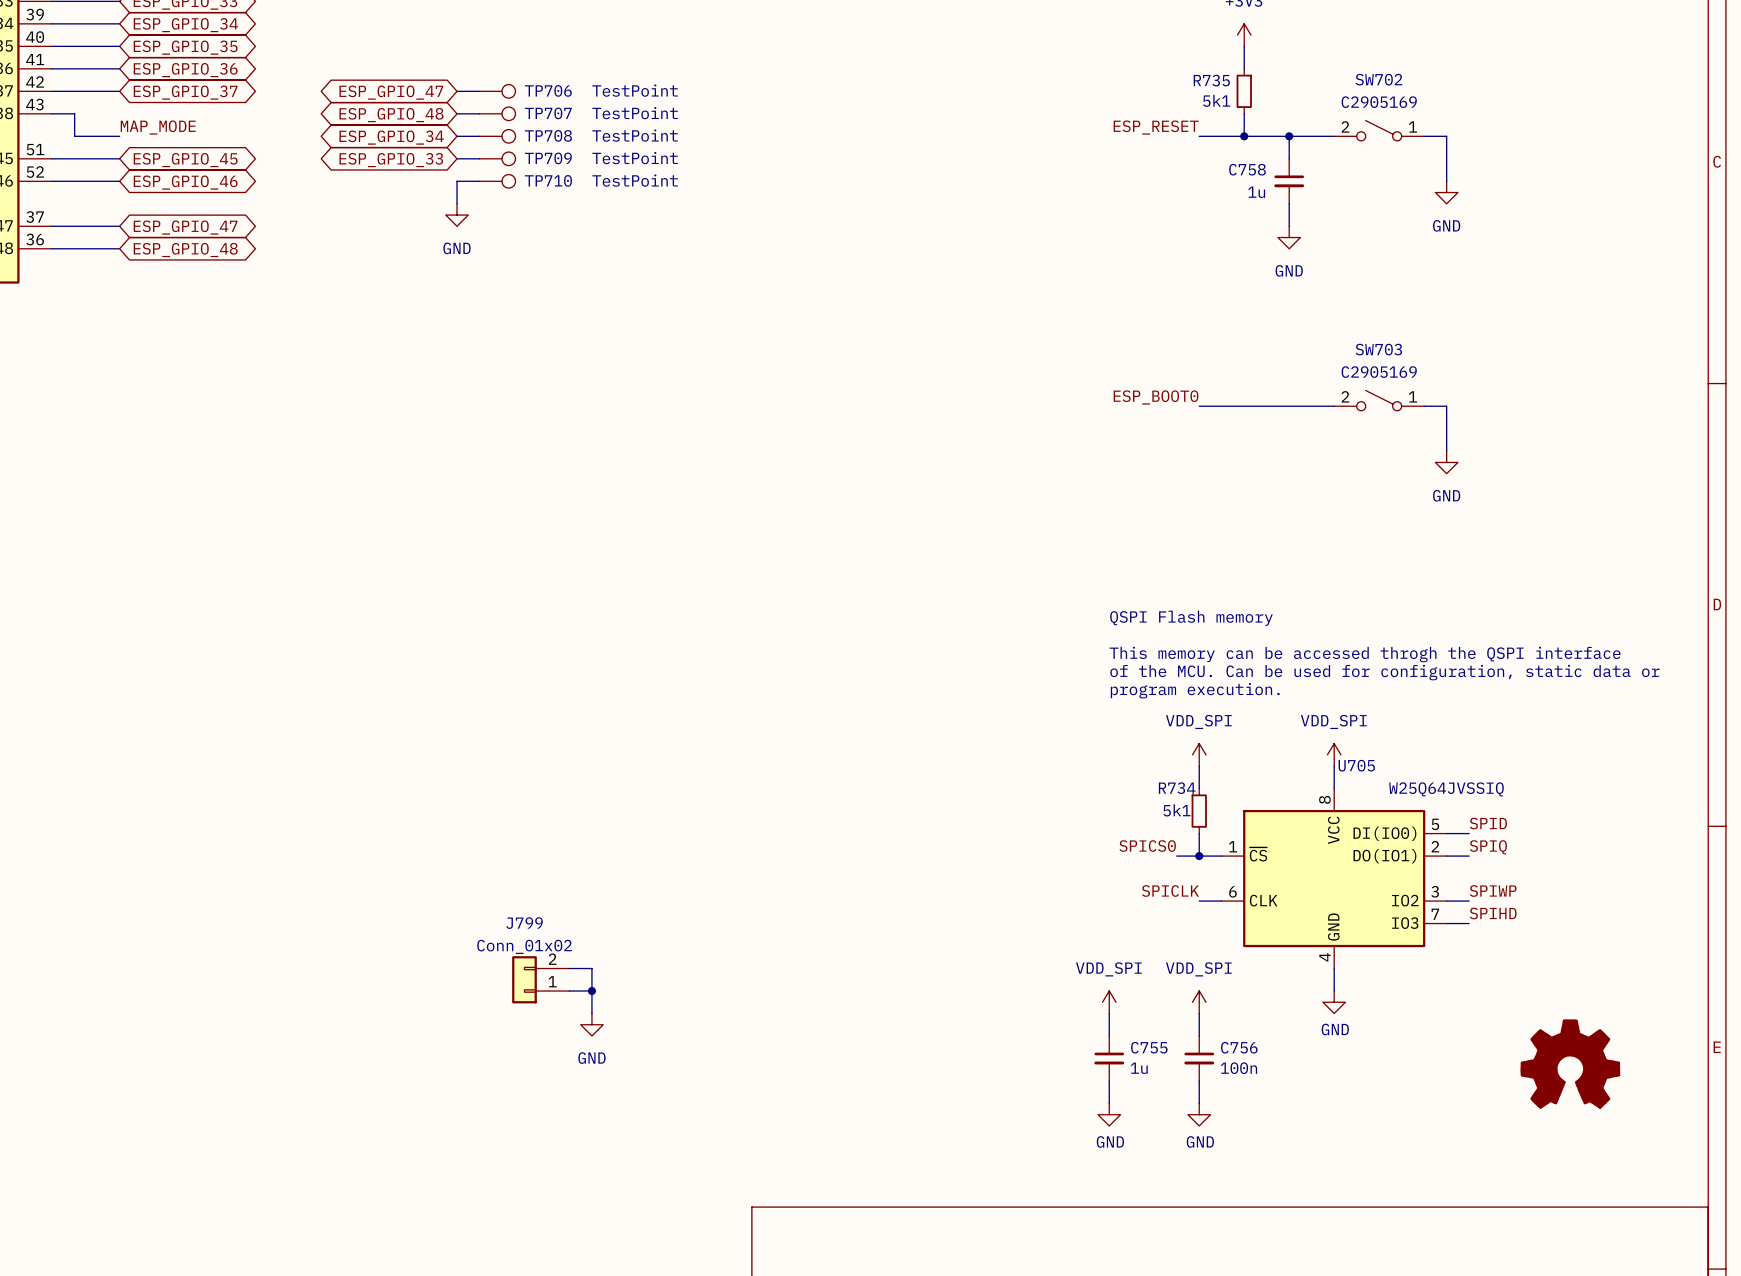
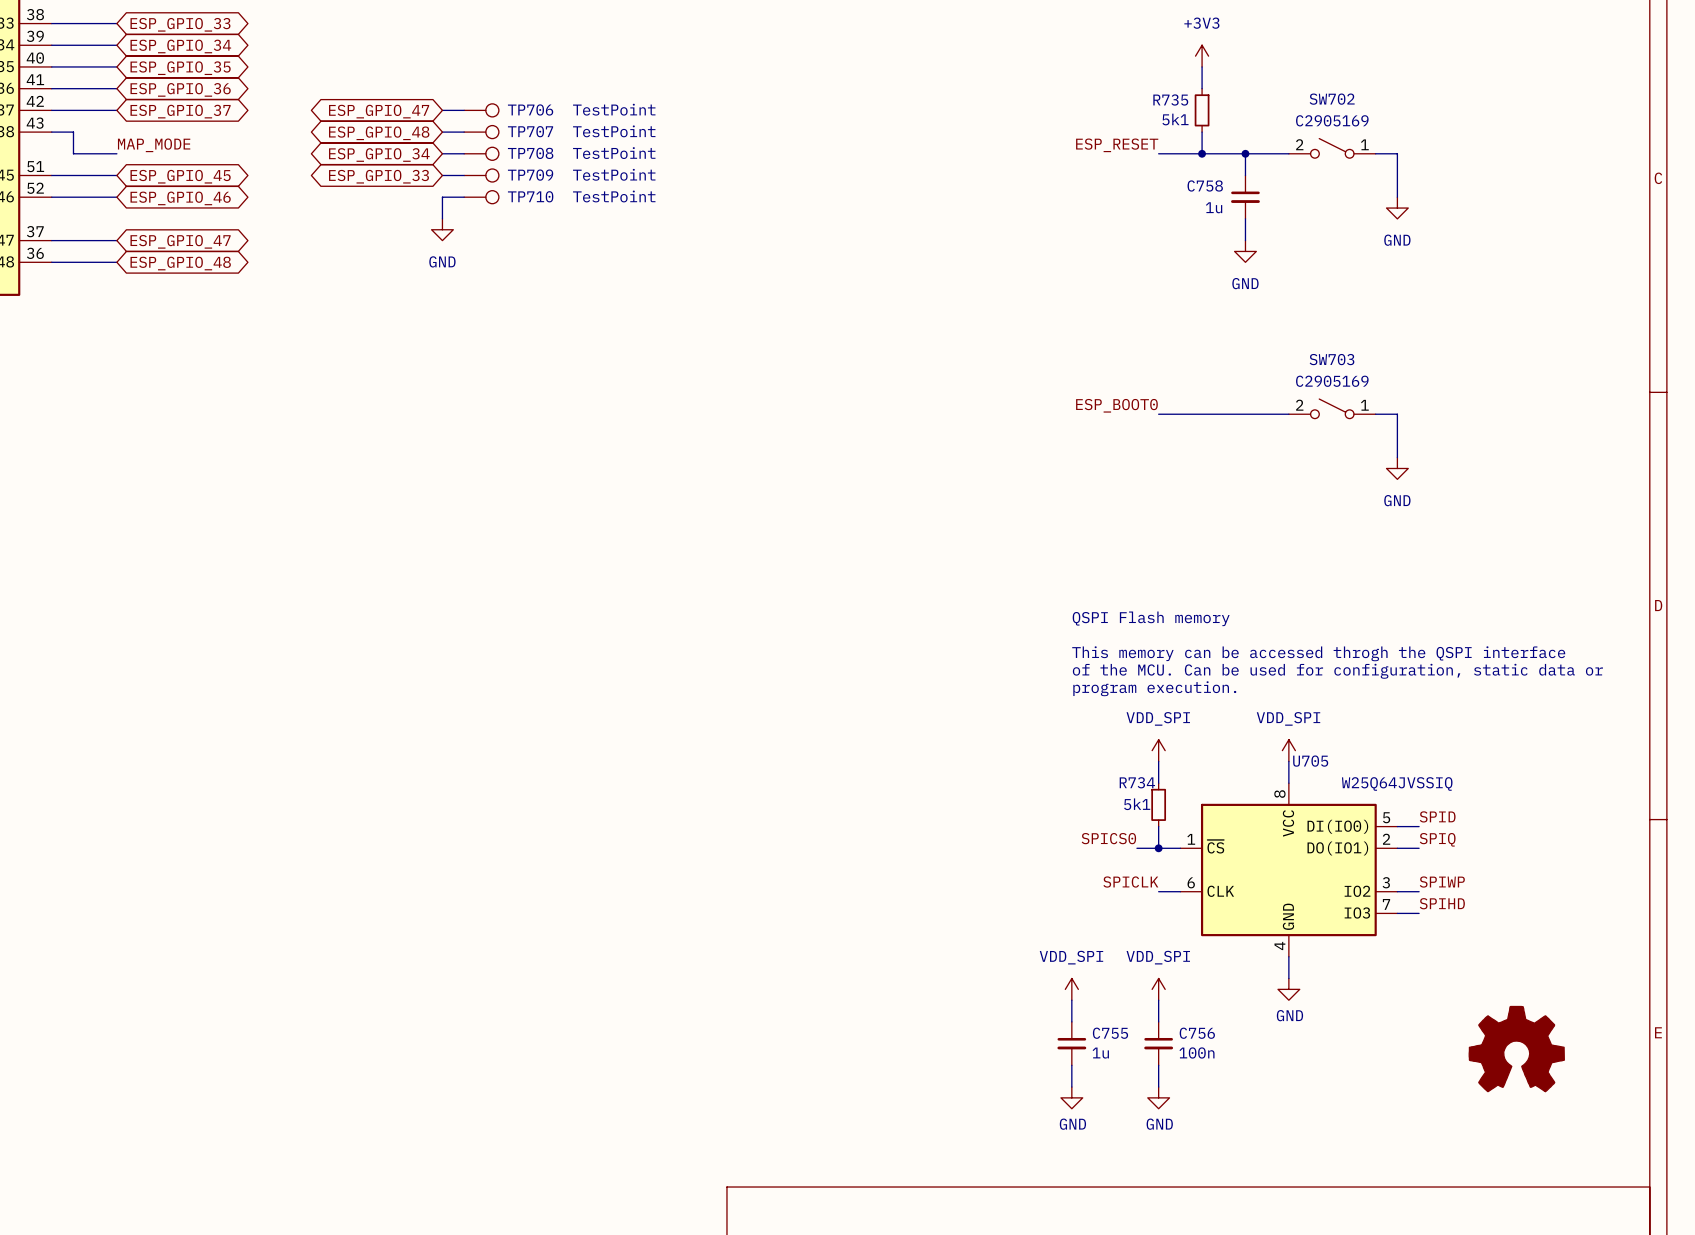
wire: (569, 968) (591, 968) (591, 1013) -> none
J799: Conn_01x02 (540, 979) -> none
wire: (569, 991) (591, 991) -> none
junction: (591, 991) -> none
power symbol: GND (591, 1024) -> none

